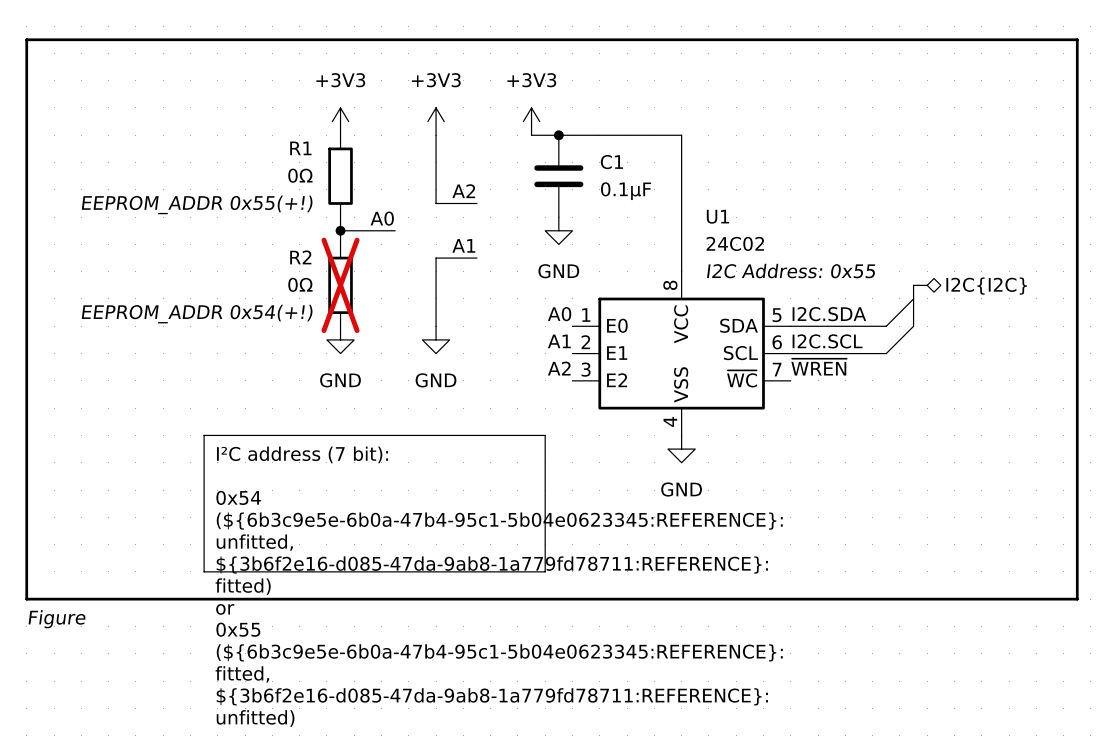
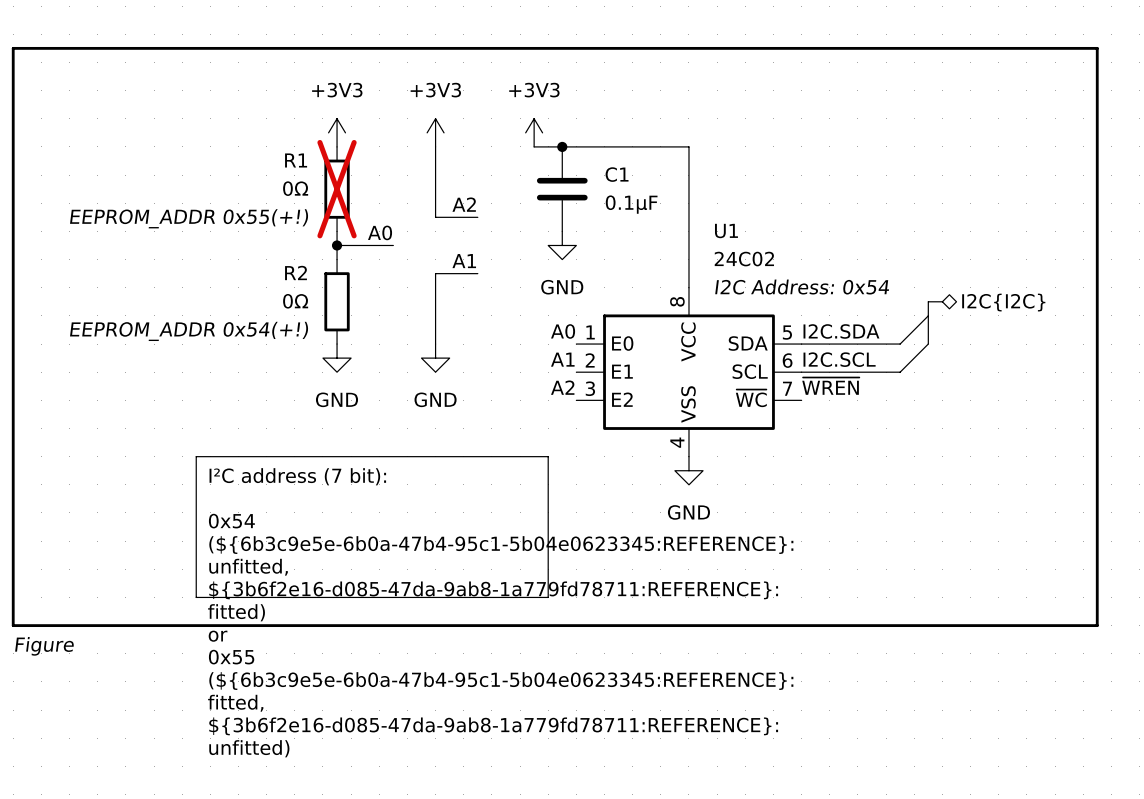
R1 do-not-place cross: none -> (337, 189)
U1 text: I2C Address: 0x55 (791, 271) -> I2C Address: 0x54 (802, 287)
R2 do-not-place cross: (340, 285) -> none

